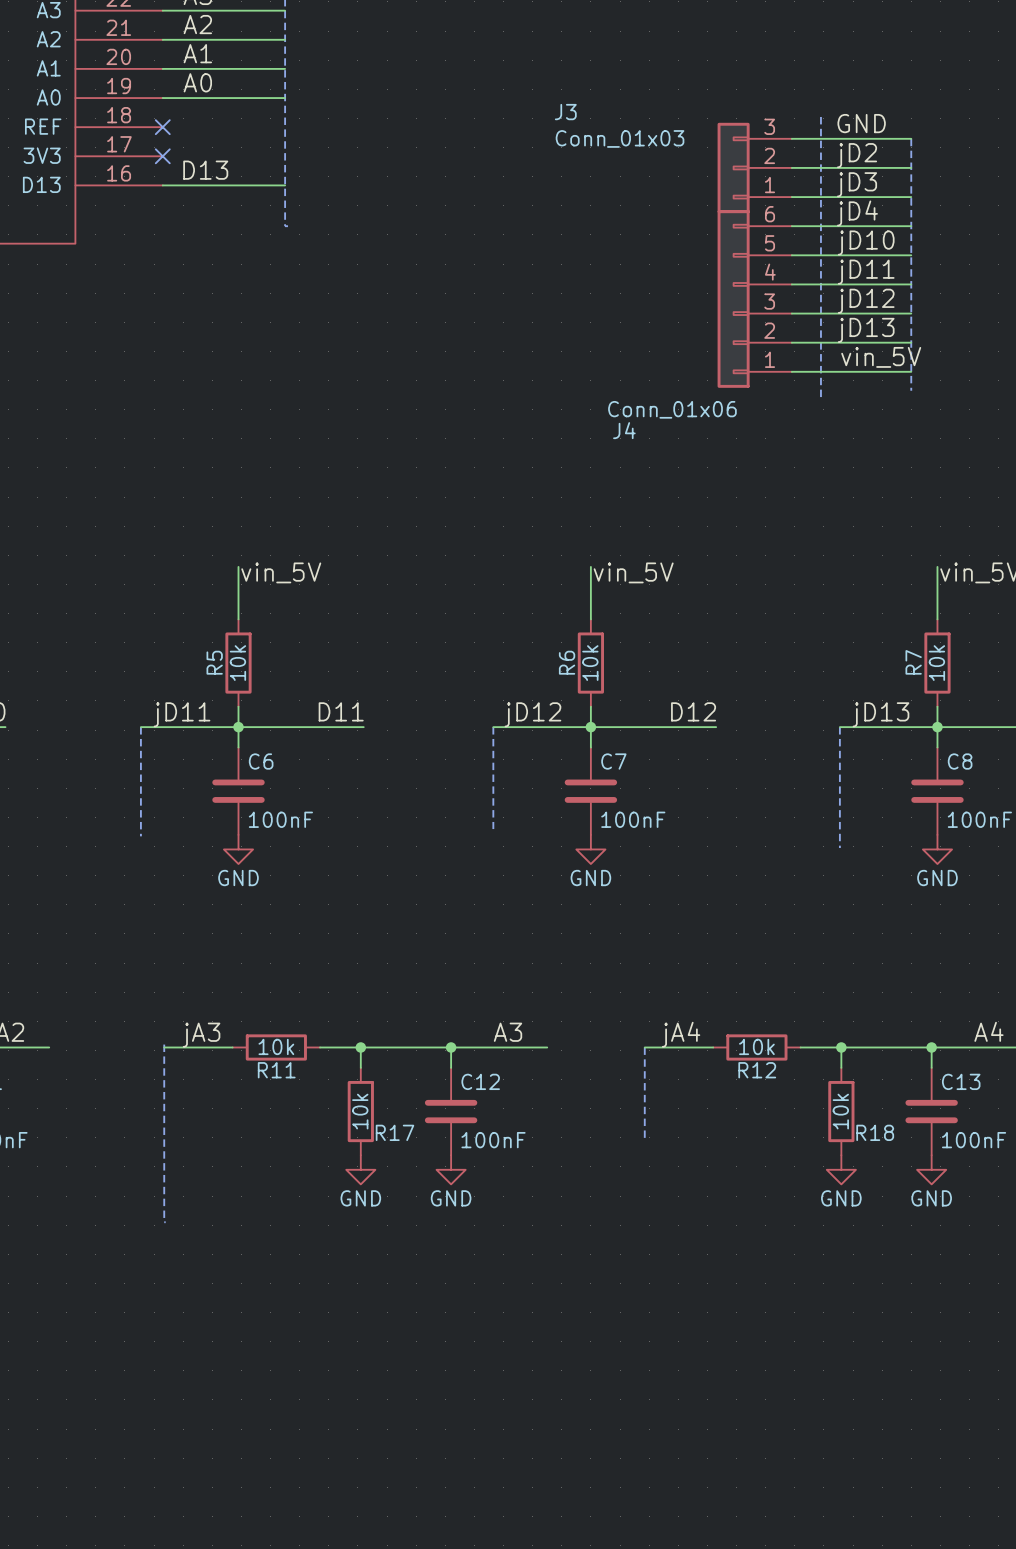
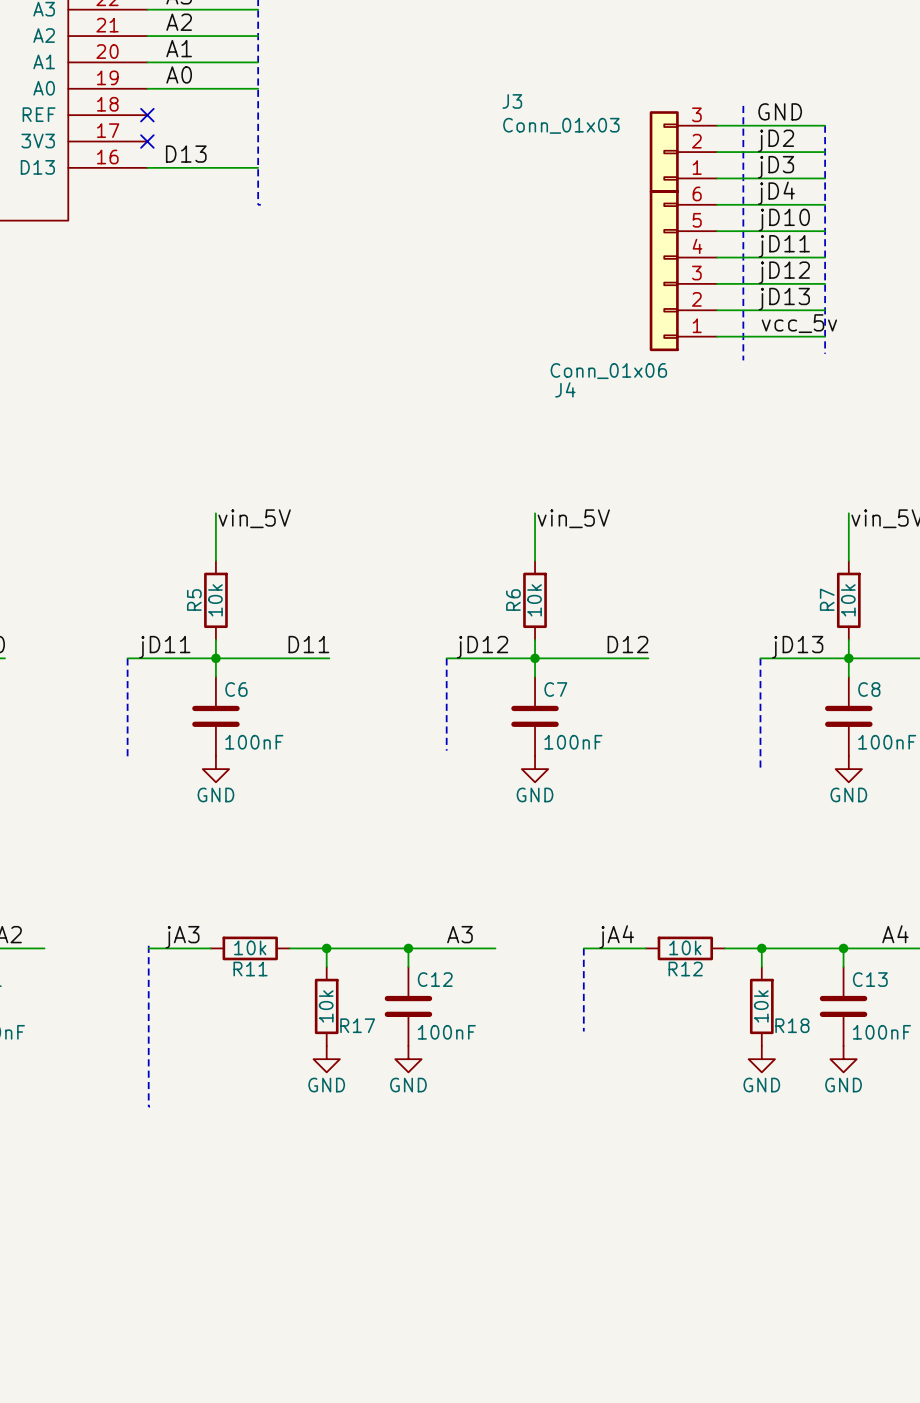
label: vin_5V (881, 357) -> vcc_5v (799, 323)

